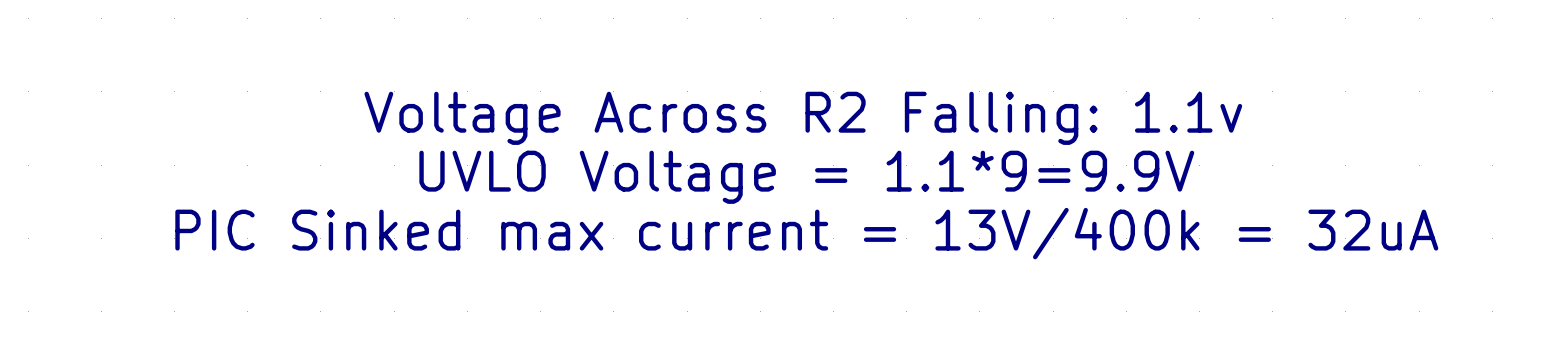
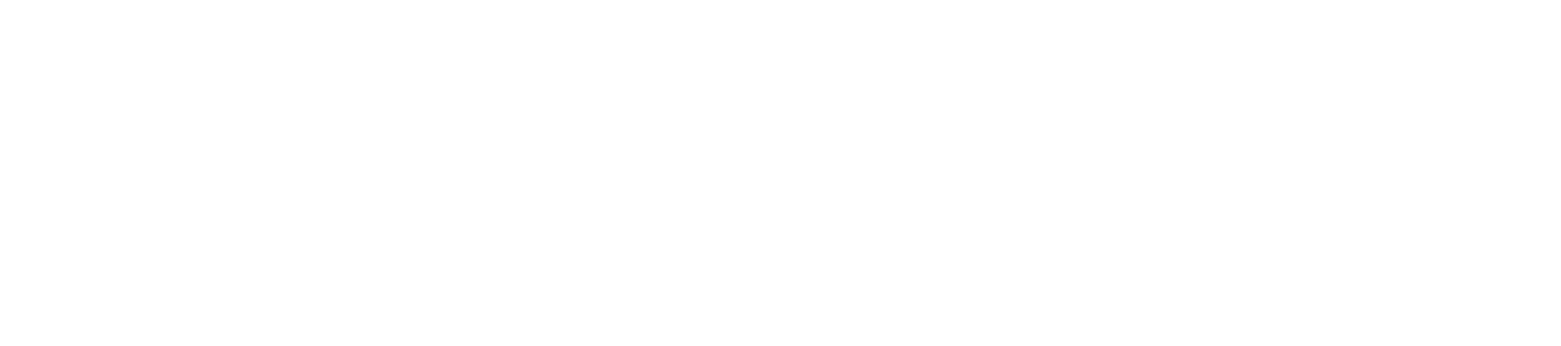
text: Voltage Across R2 Falling: 1.1v (803, 118) -> none
text: UVLO Voltage = 1.1*9=9.9V (806, 177) -> none
text: PIC Sinked max current = 13V/400k = 32uA (806, 233) -> none

